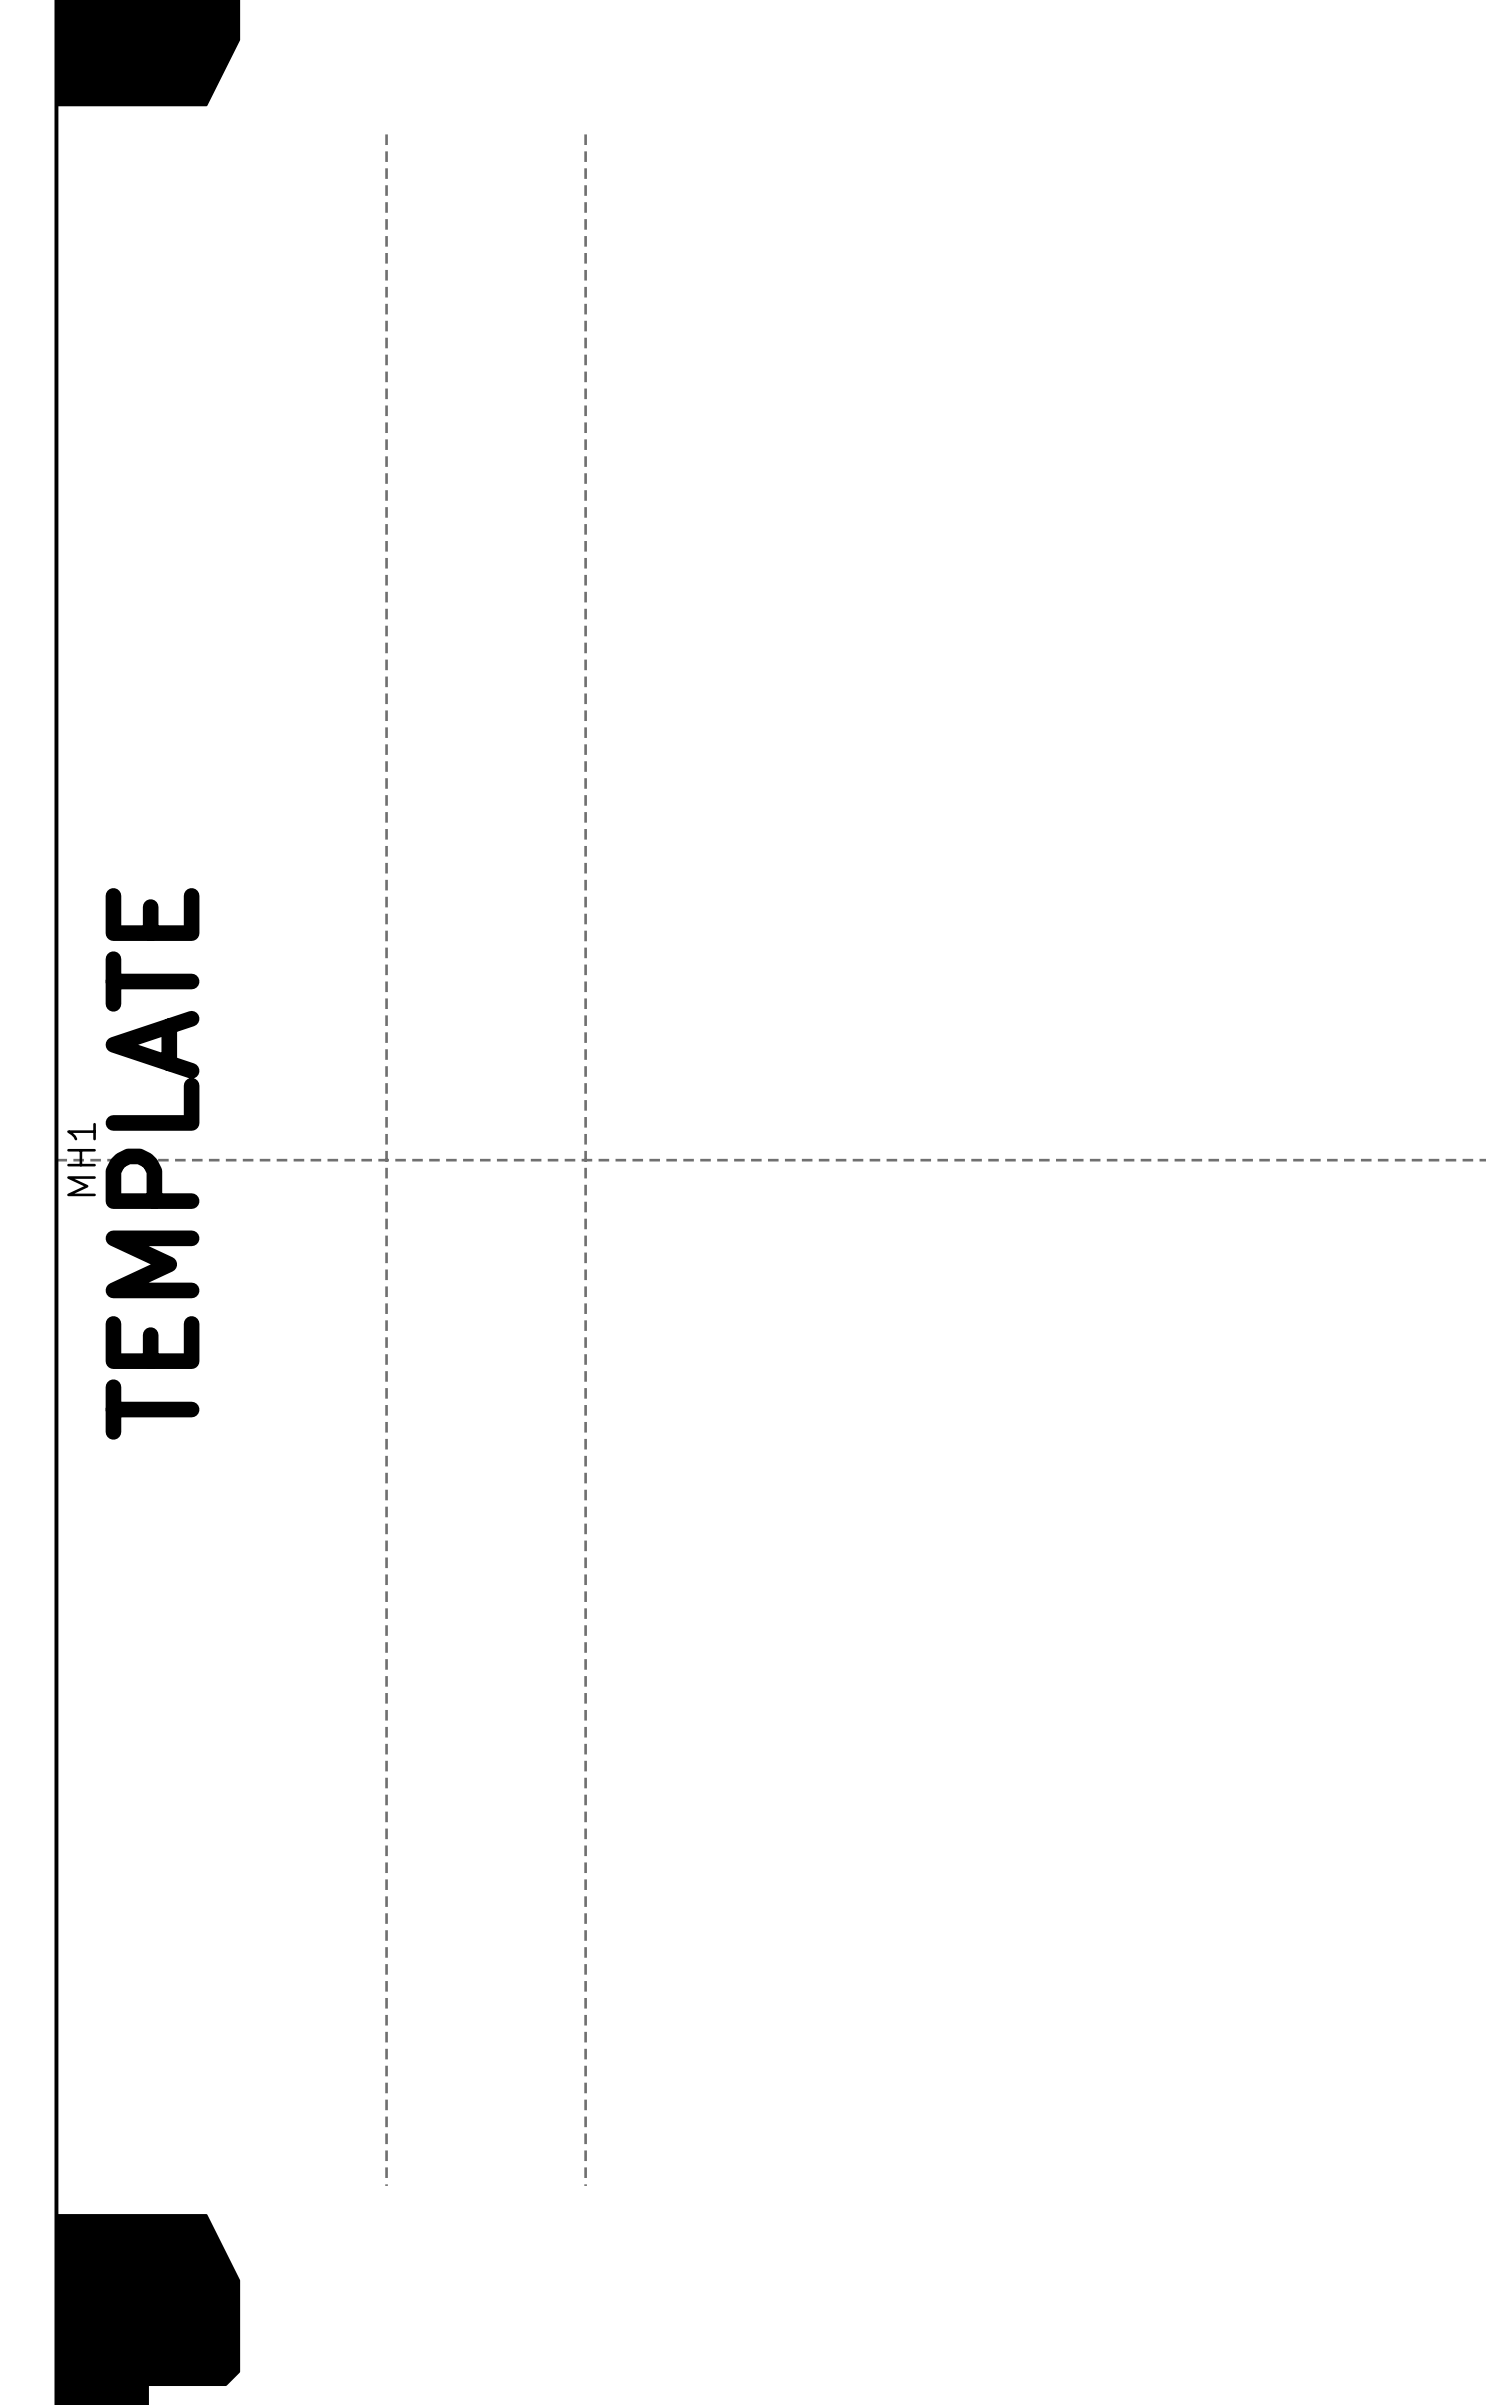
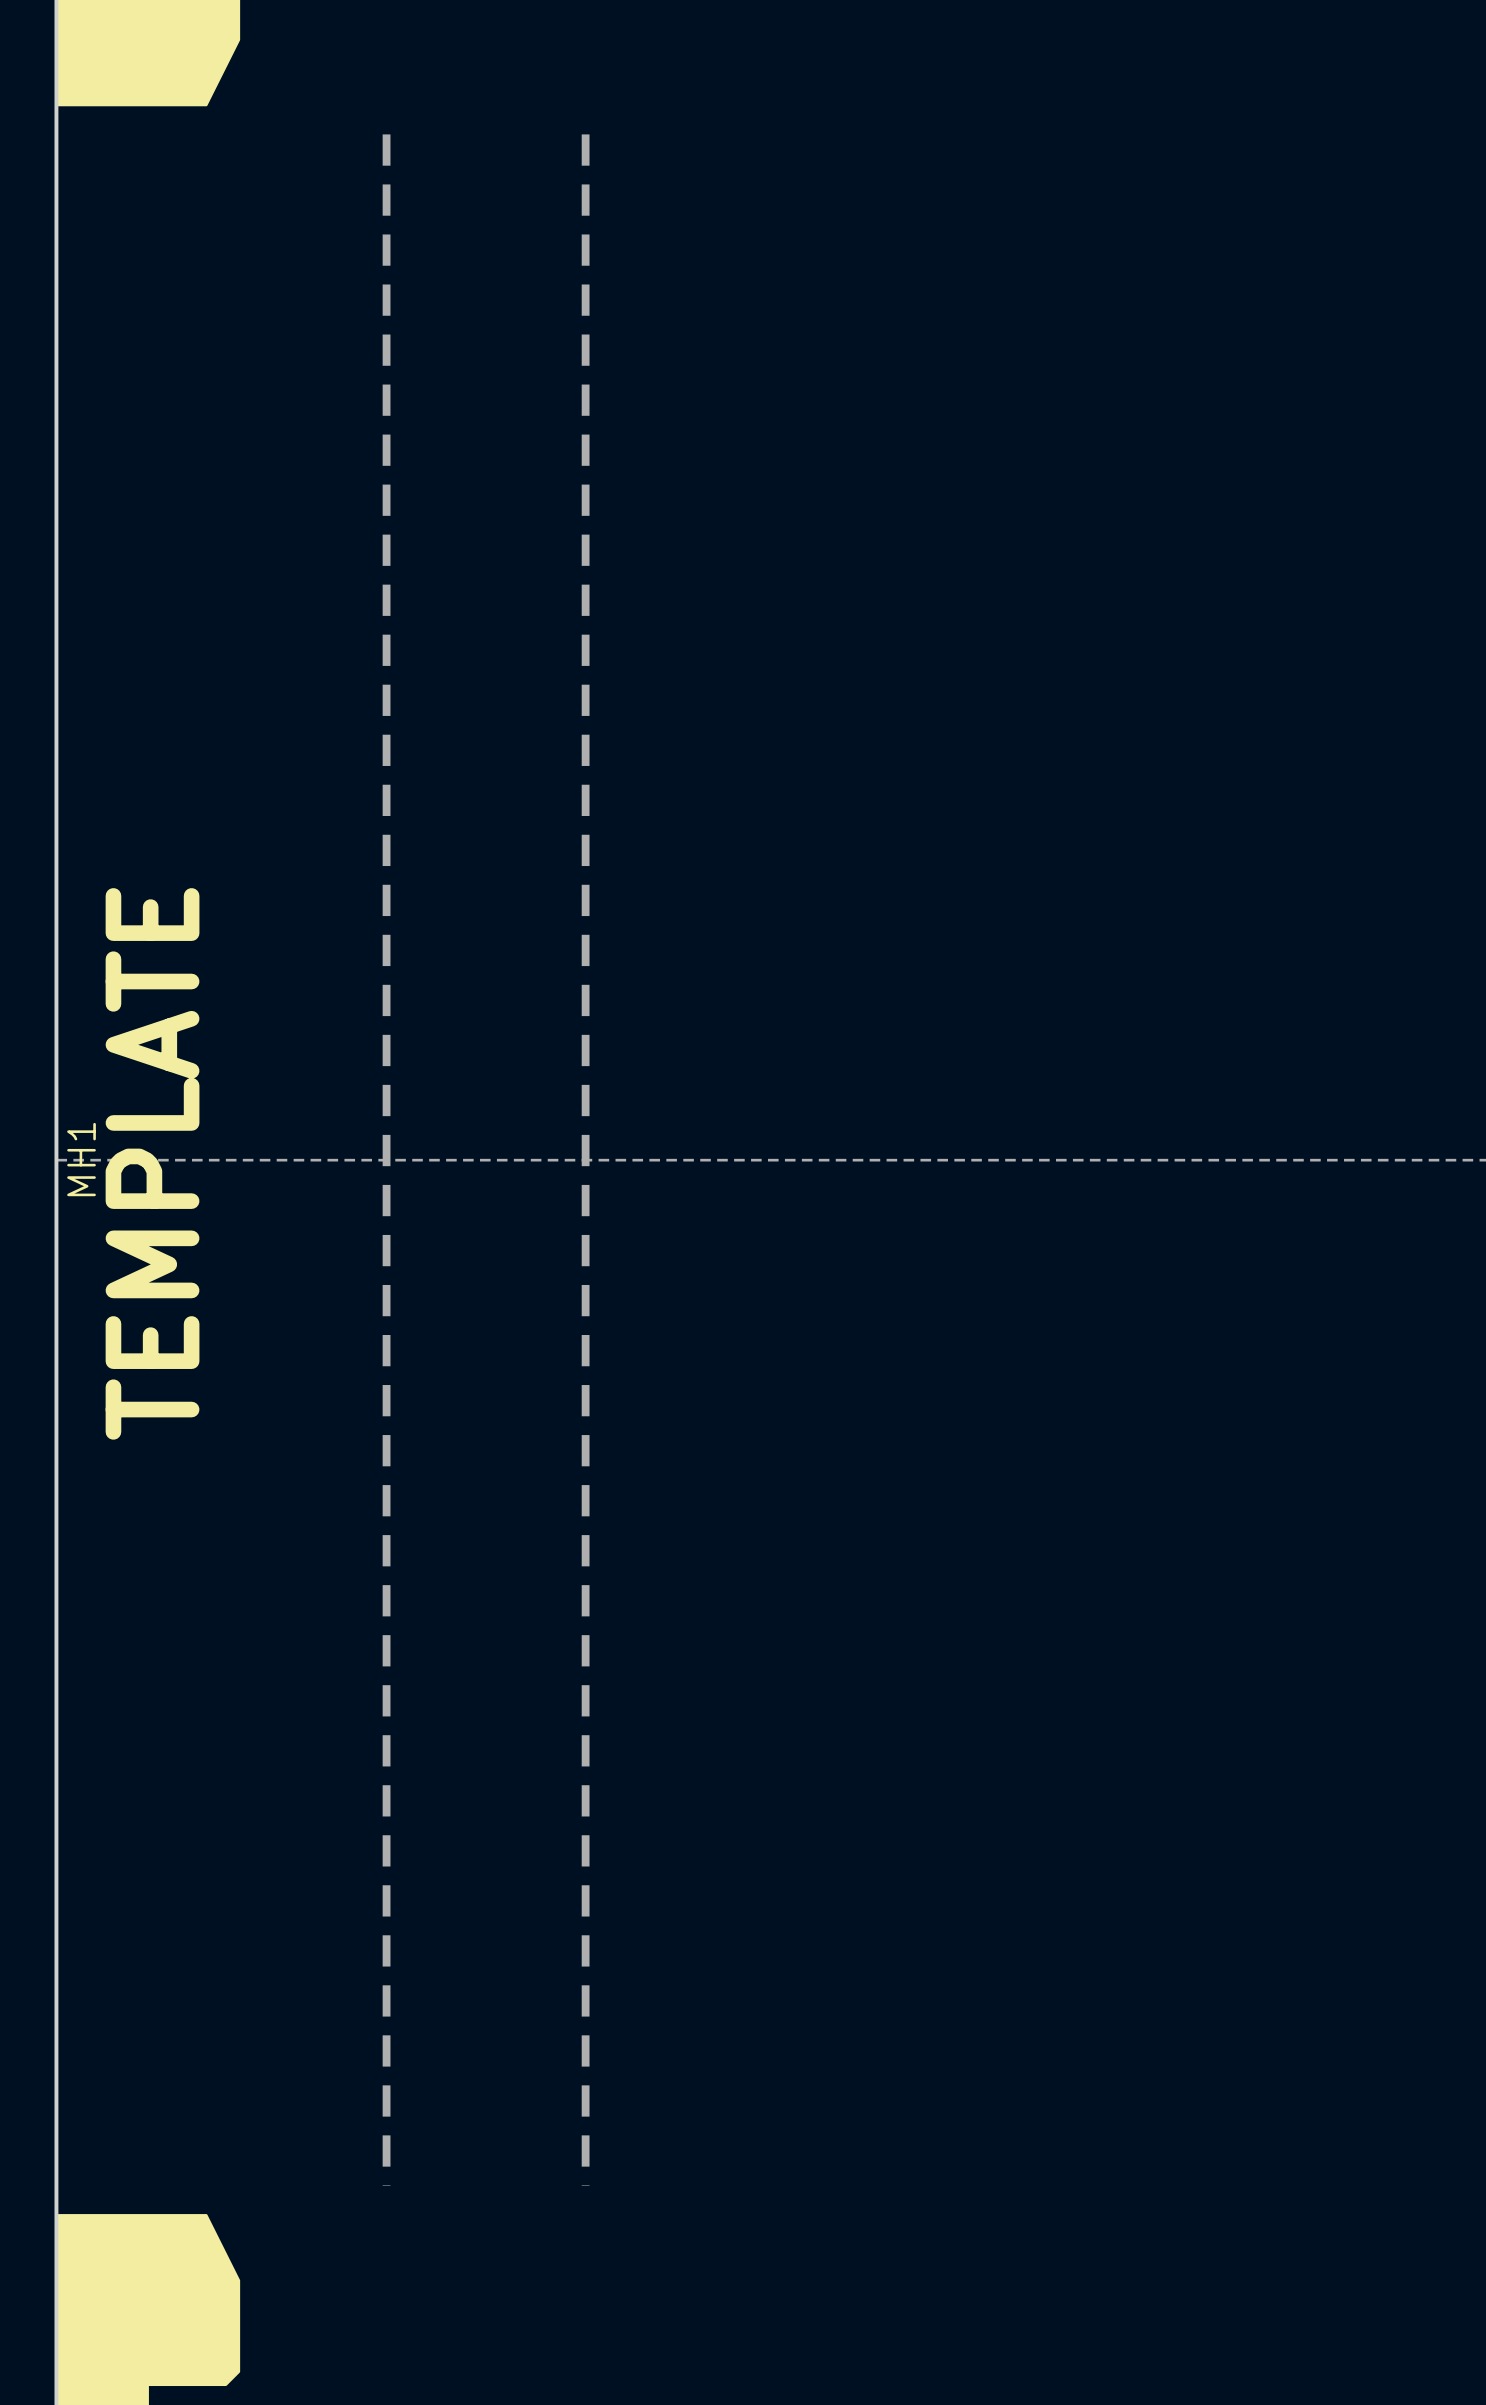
line width: thin (386, 134) (386, 2185) -> thick (386, 134) (386, 2185)
line width: thin (585, 134) (585, 2185) -> thick (585, 134) (585, 2185)

